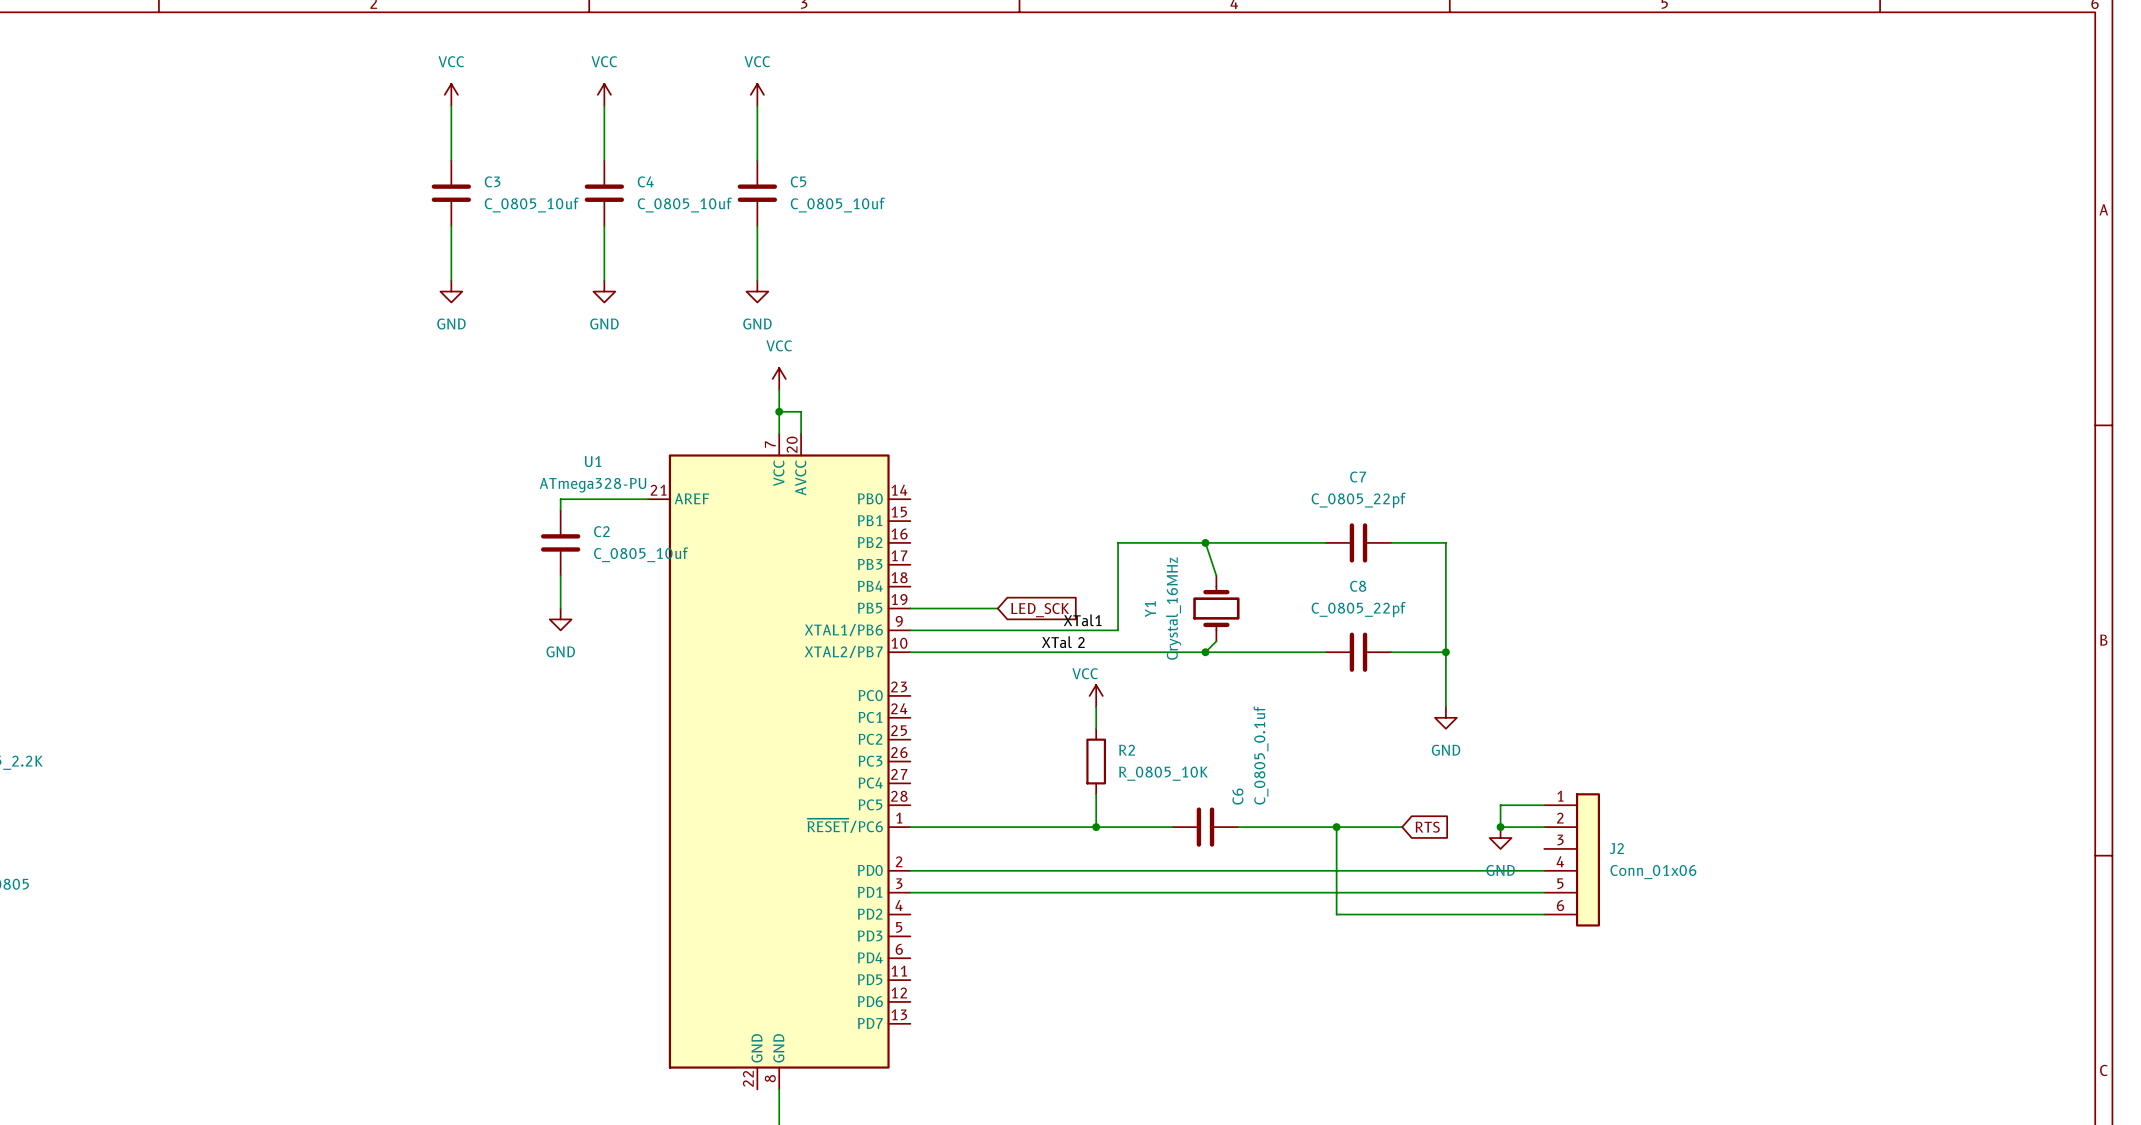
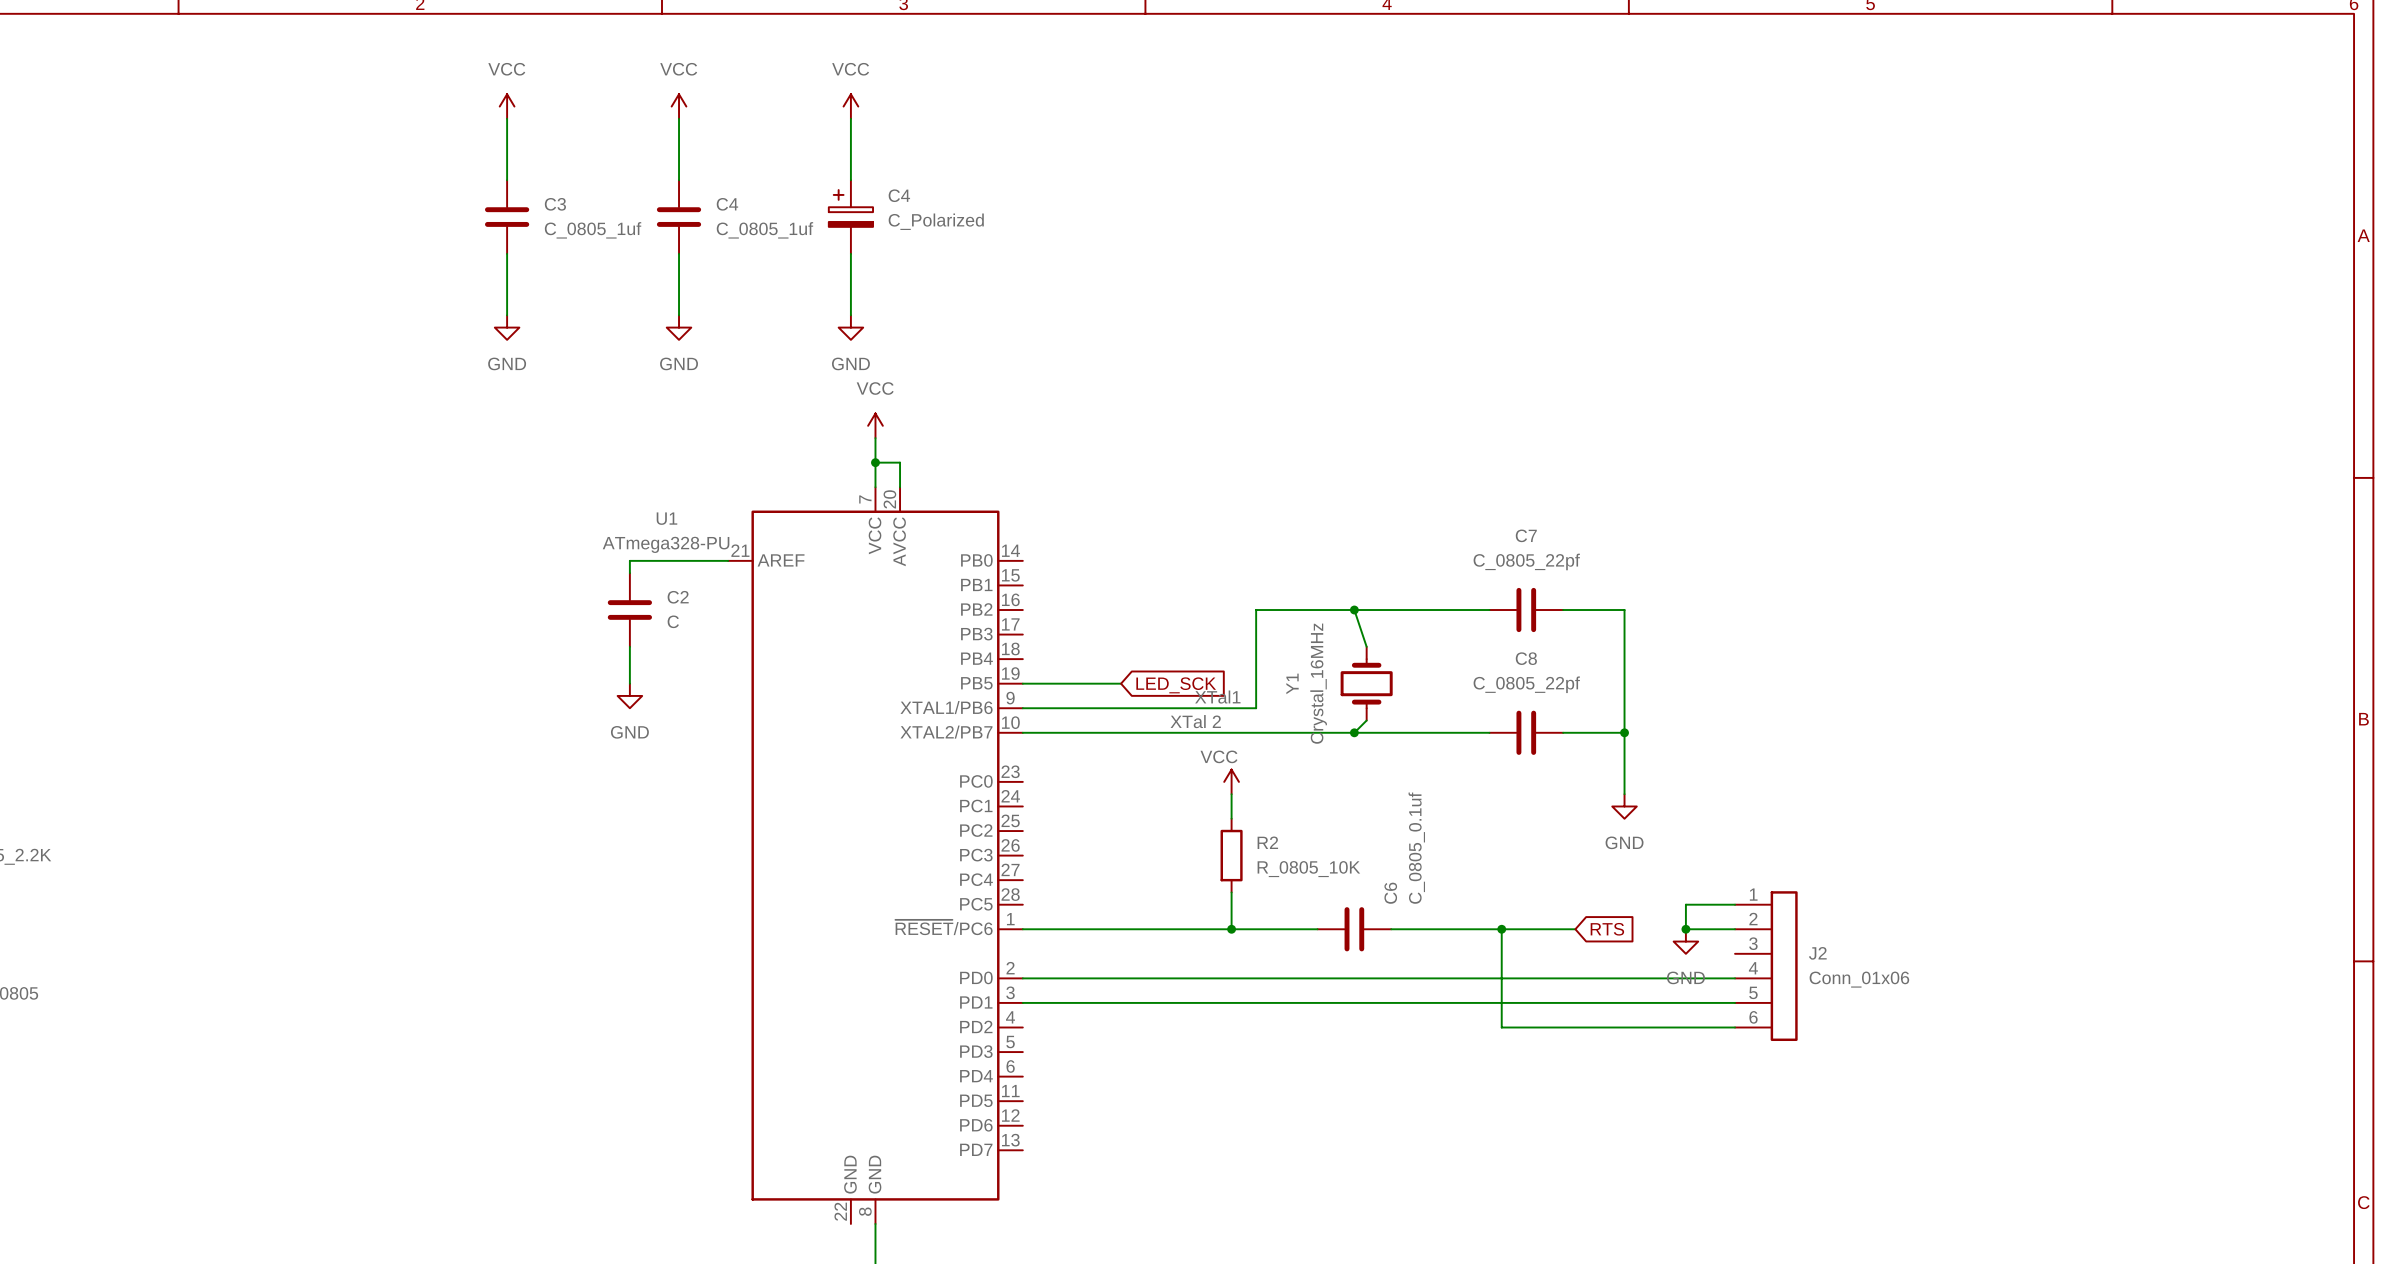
C5: C_0805_10uf (757, 193) -> none
C4: none -> C_Polarized (850, 217)
C3 value: C_0805_10uf (531, 205) -> C_0805_1uf (593, 230)
C4 value: C_0805_10uf (684, 205) -> C_0805_1uf (764, 230)
C2 value: C_0805_10uf (641, 554) -> C (673, 621)

